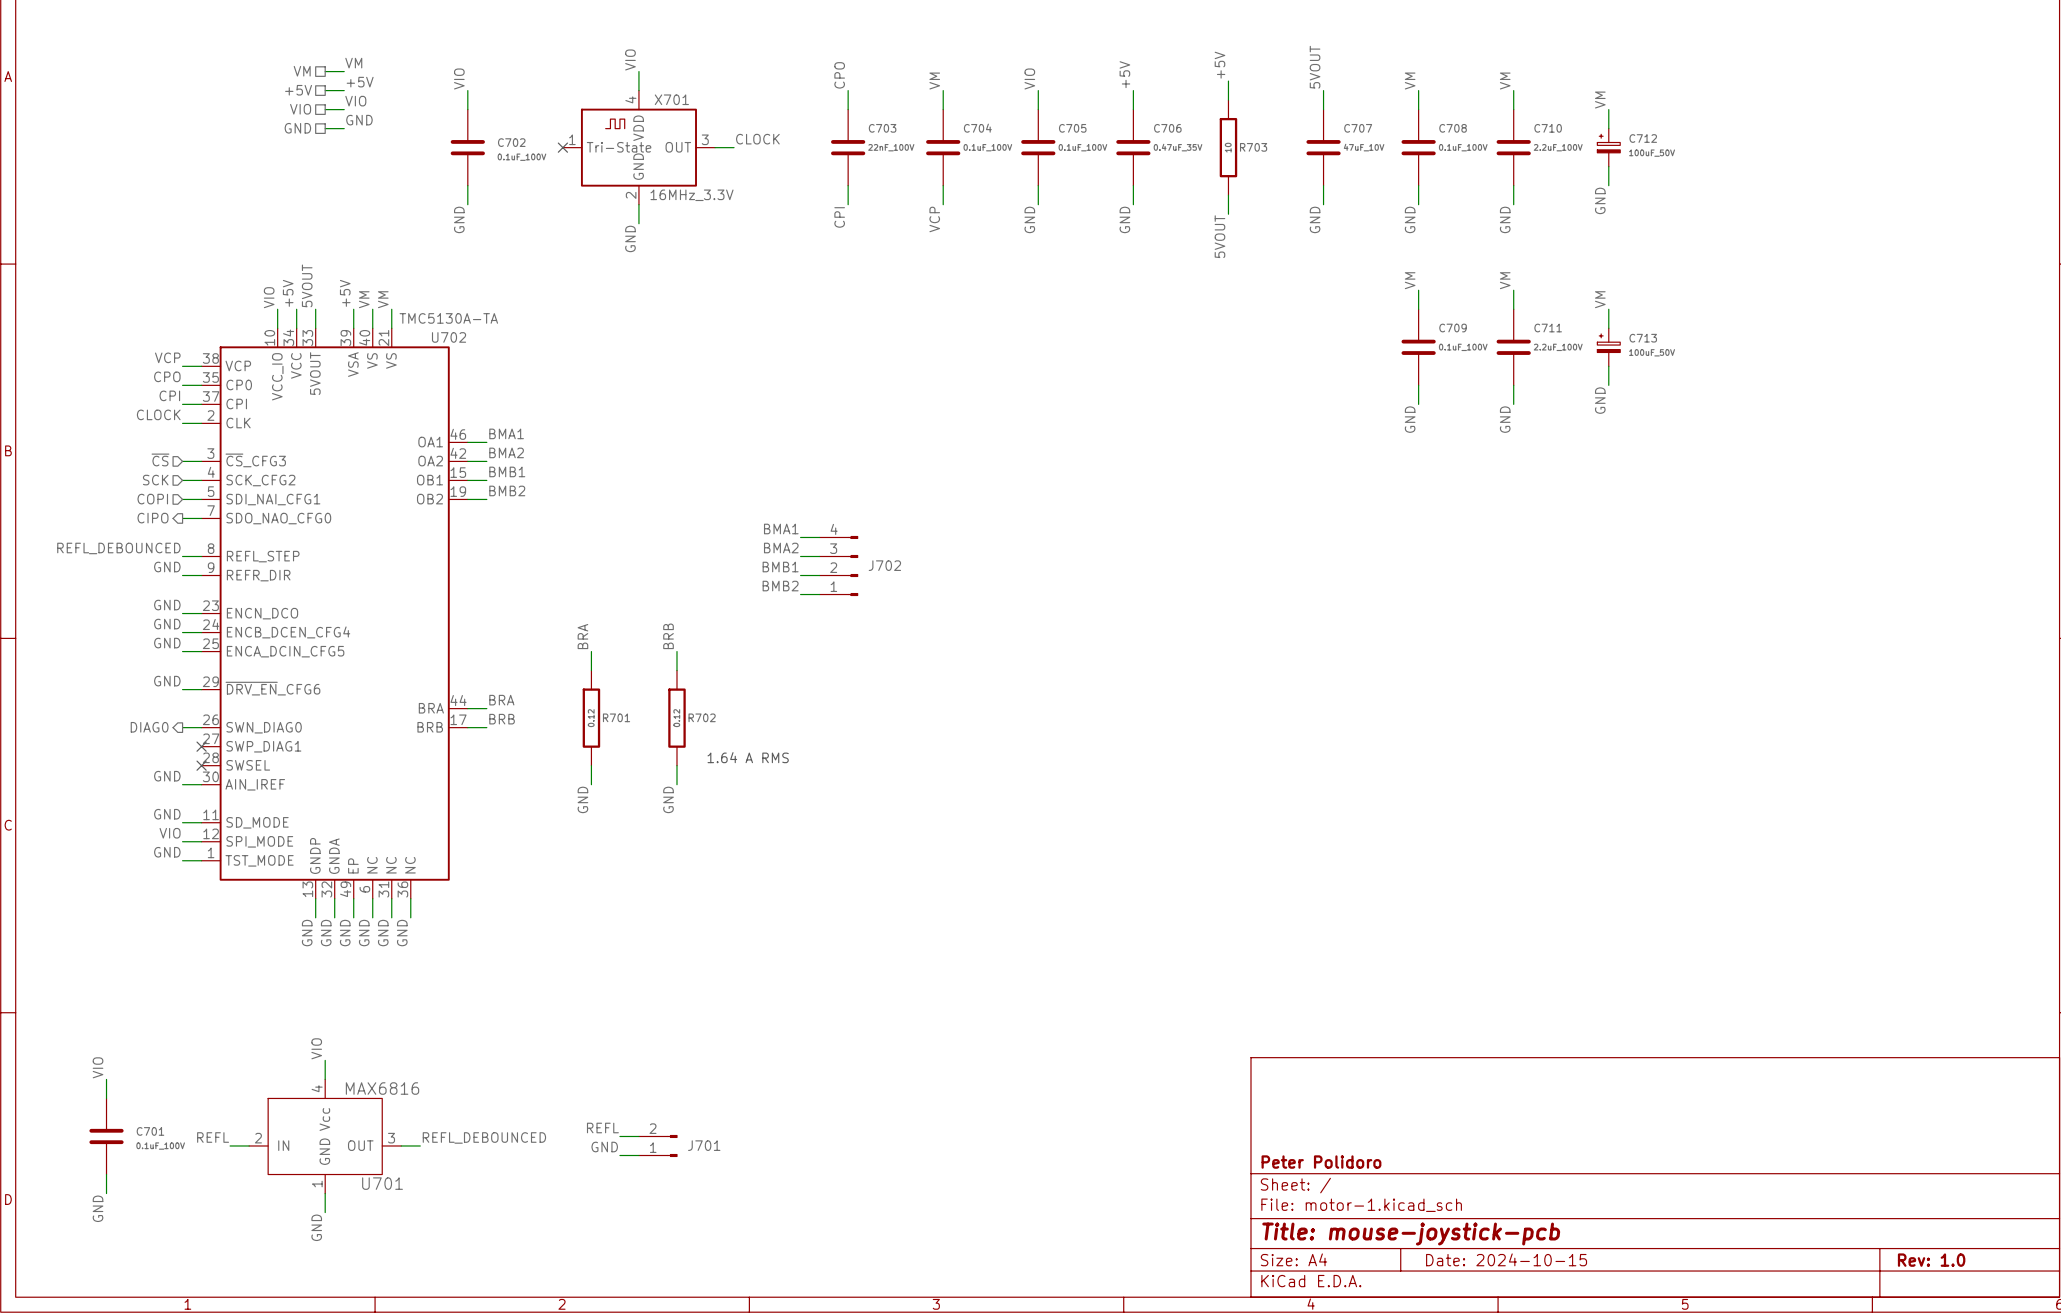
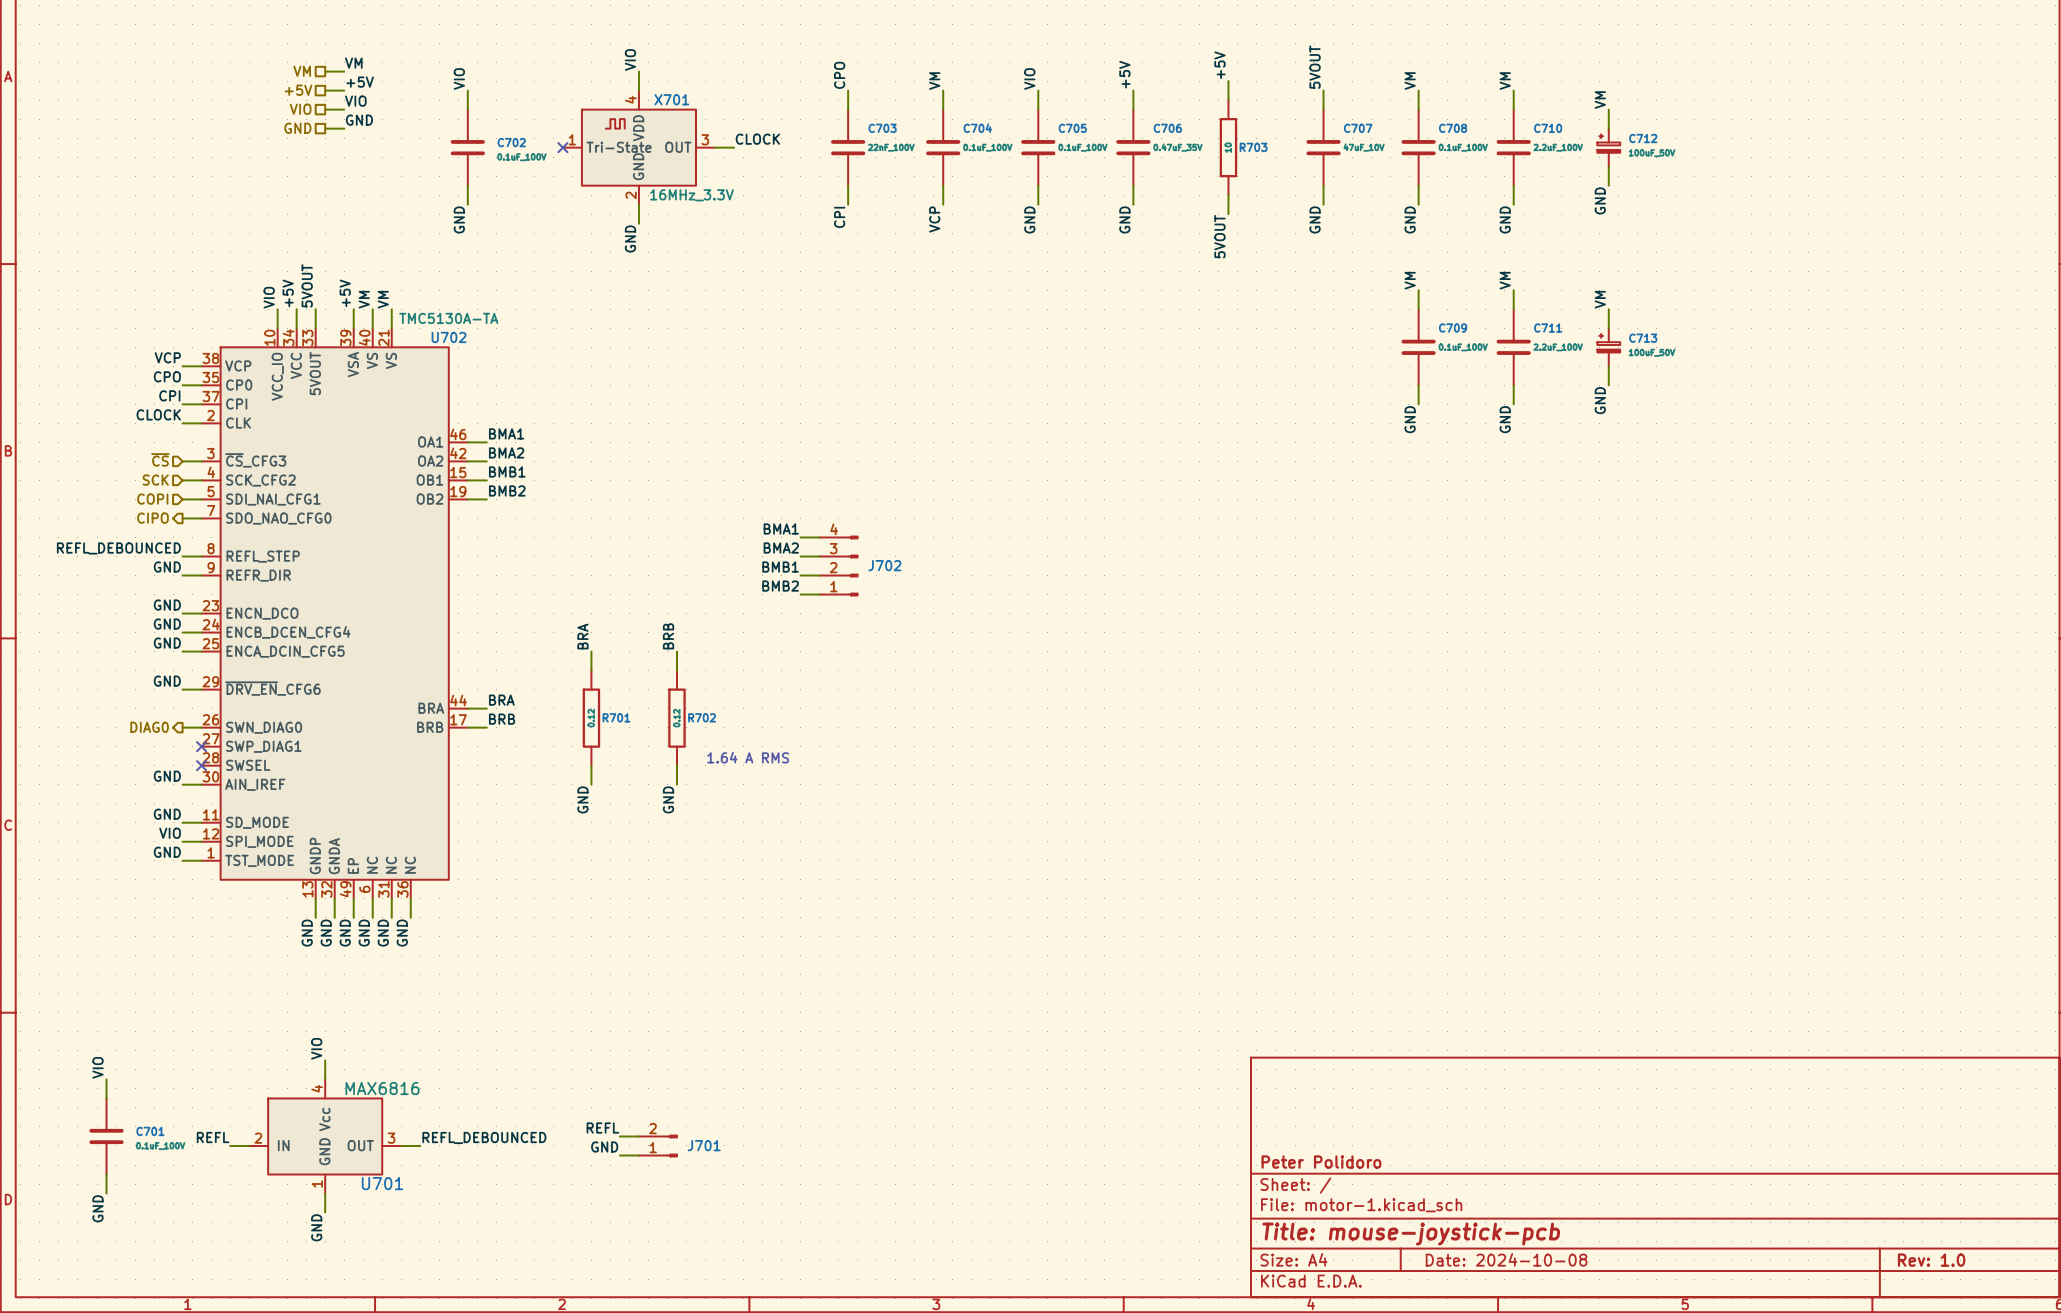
title block: Date: 2024-10-15 (1506, 1259) -> Date: 2024-10-08 (1506, 1259)

